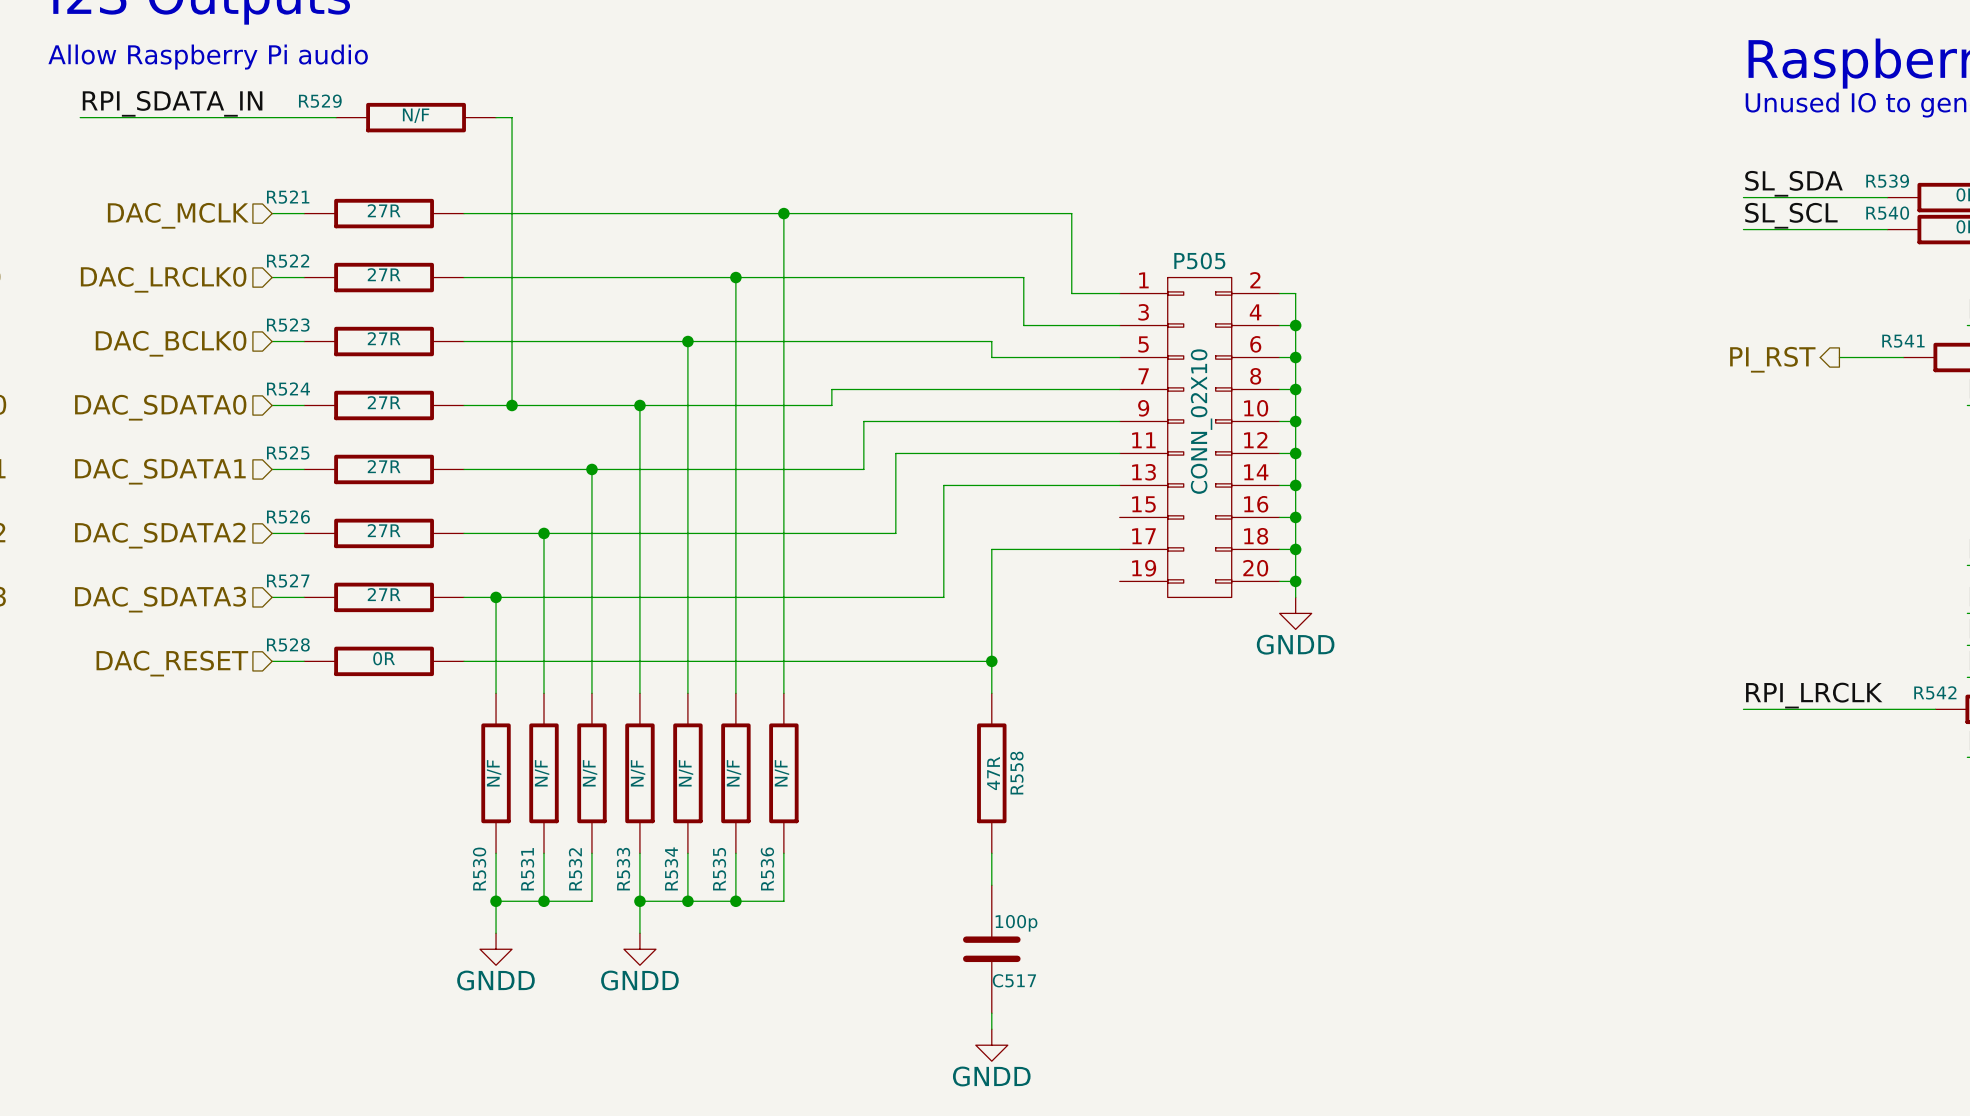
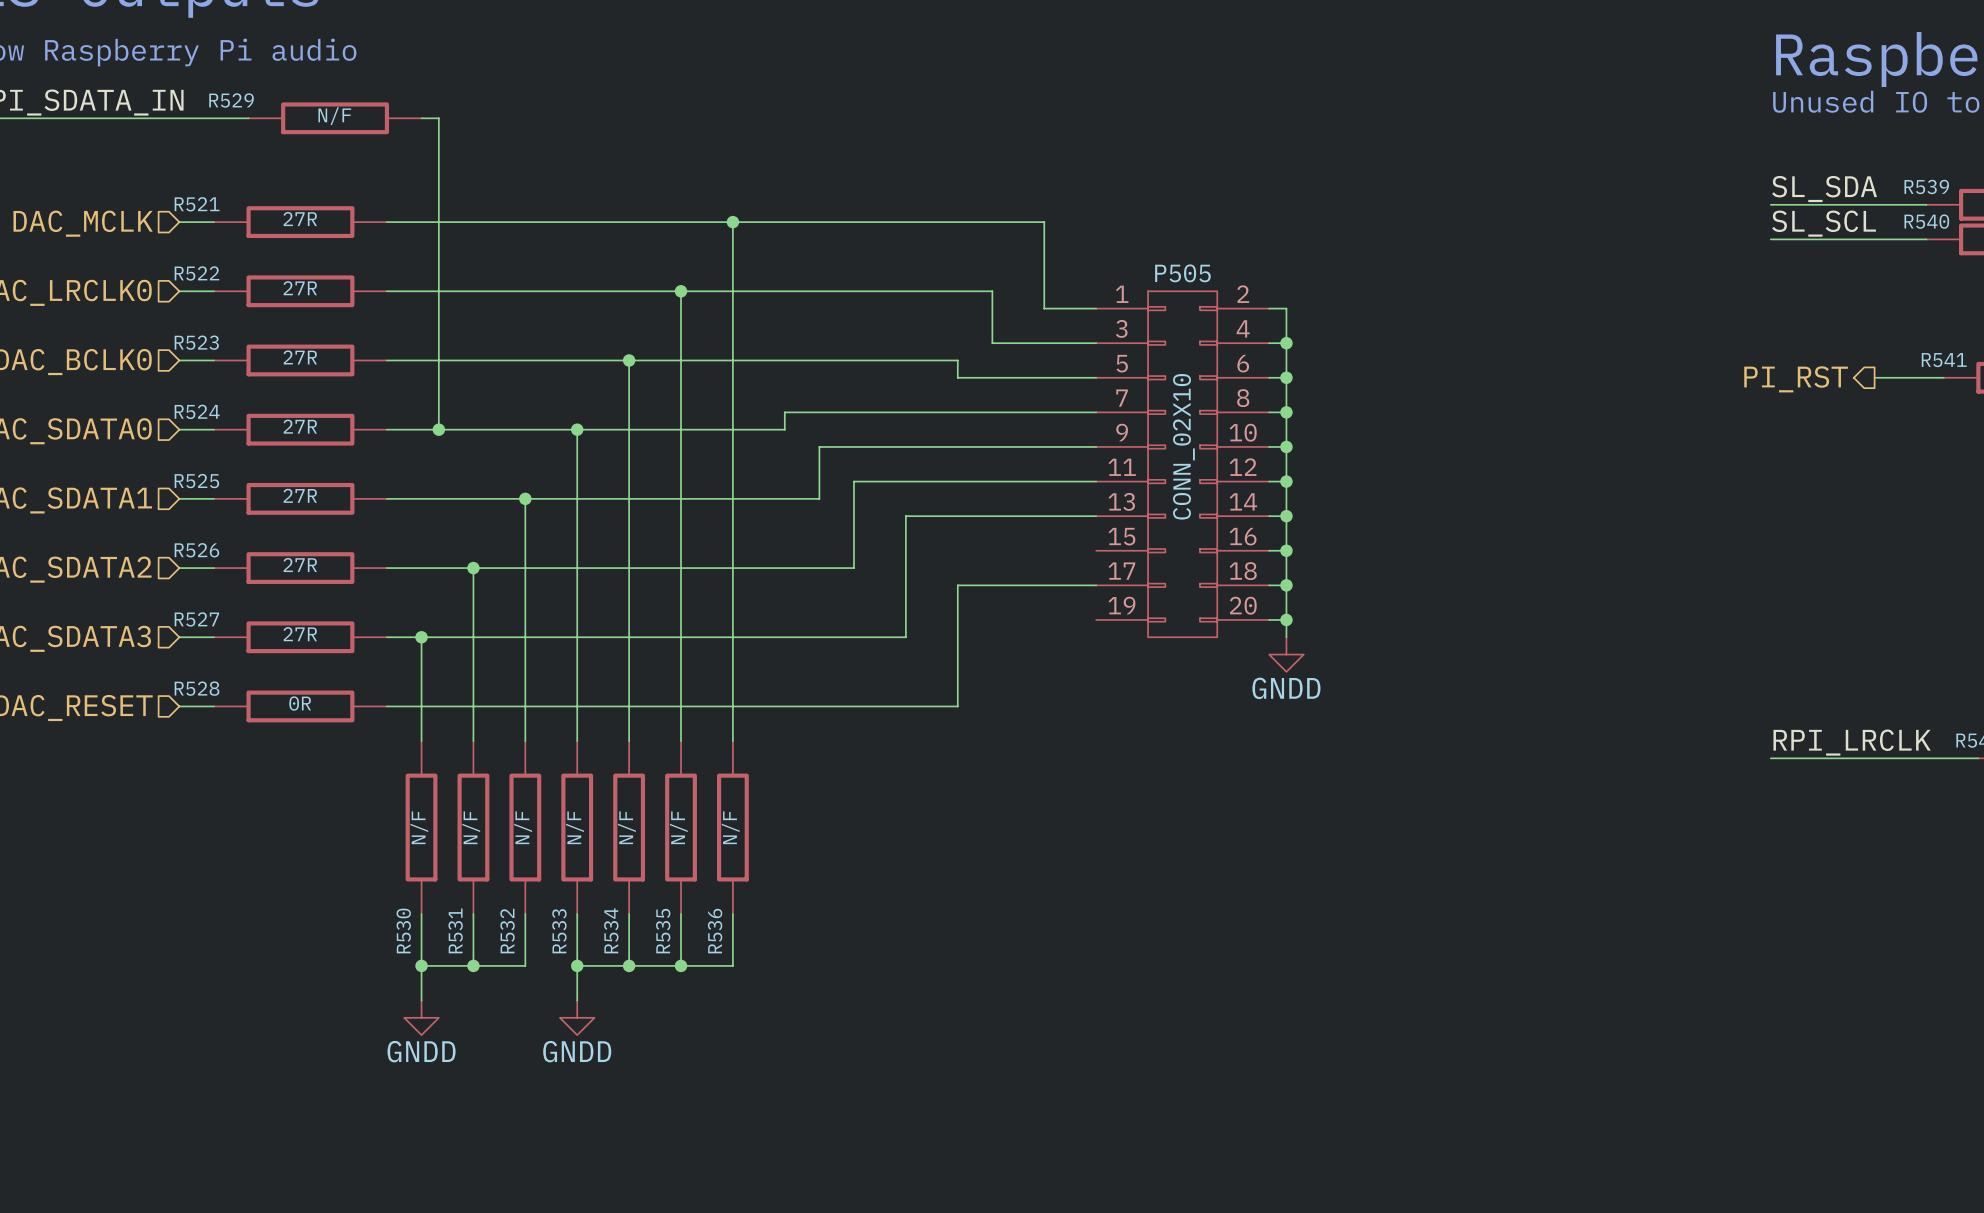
wire: (991, 661) (991, 693) -> none
junction: (991, 661) -> none
R558: 47R (991, 773) -> none
wire: (991, 853) (991, 885) -> none
C517: 100p (991, 949) -> none
wire: (991, 1013) (991, 1029) -> none
power symbol: GNDD (991, 1045) -> none

